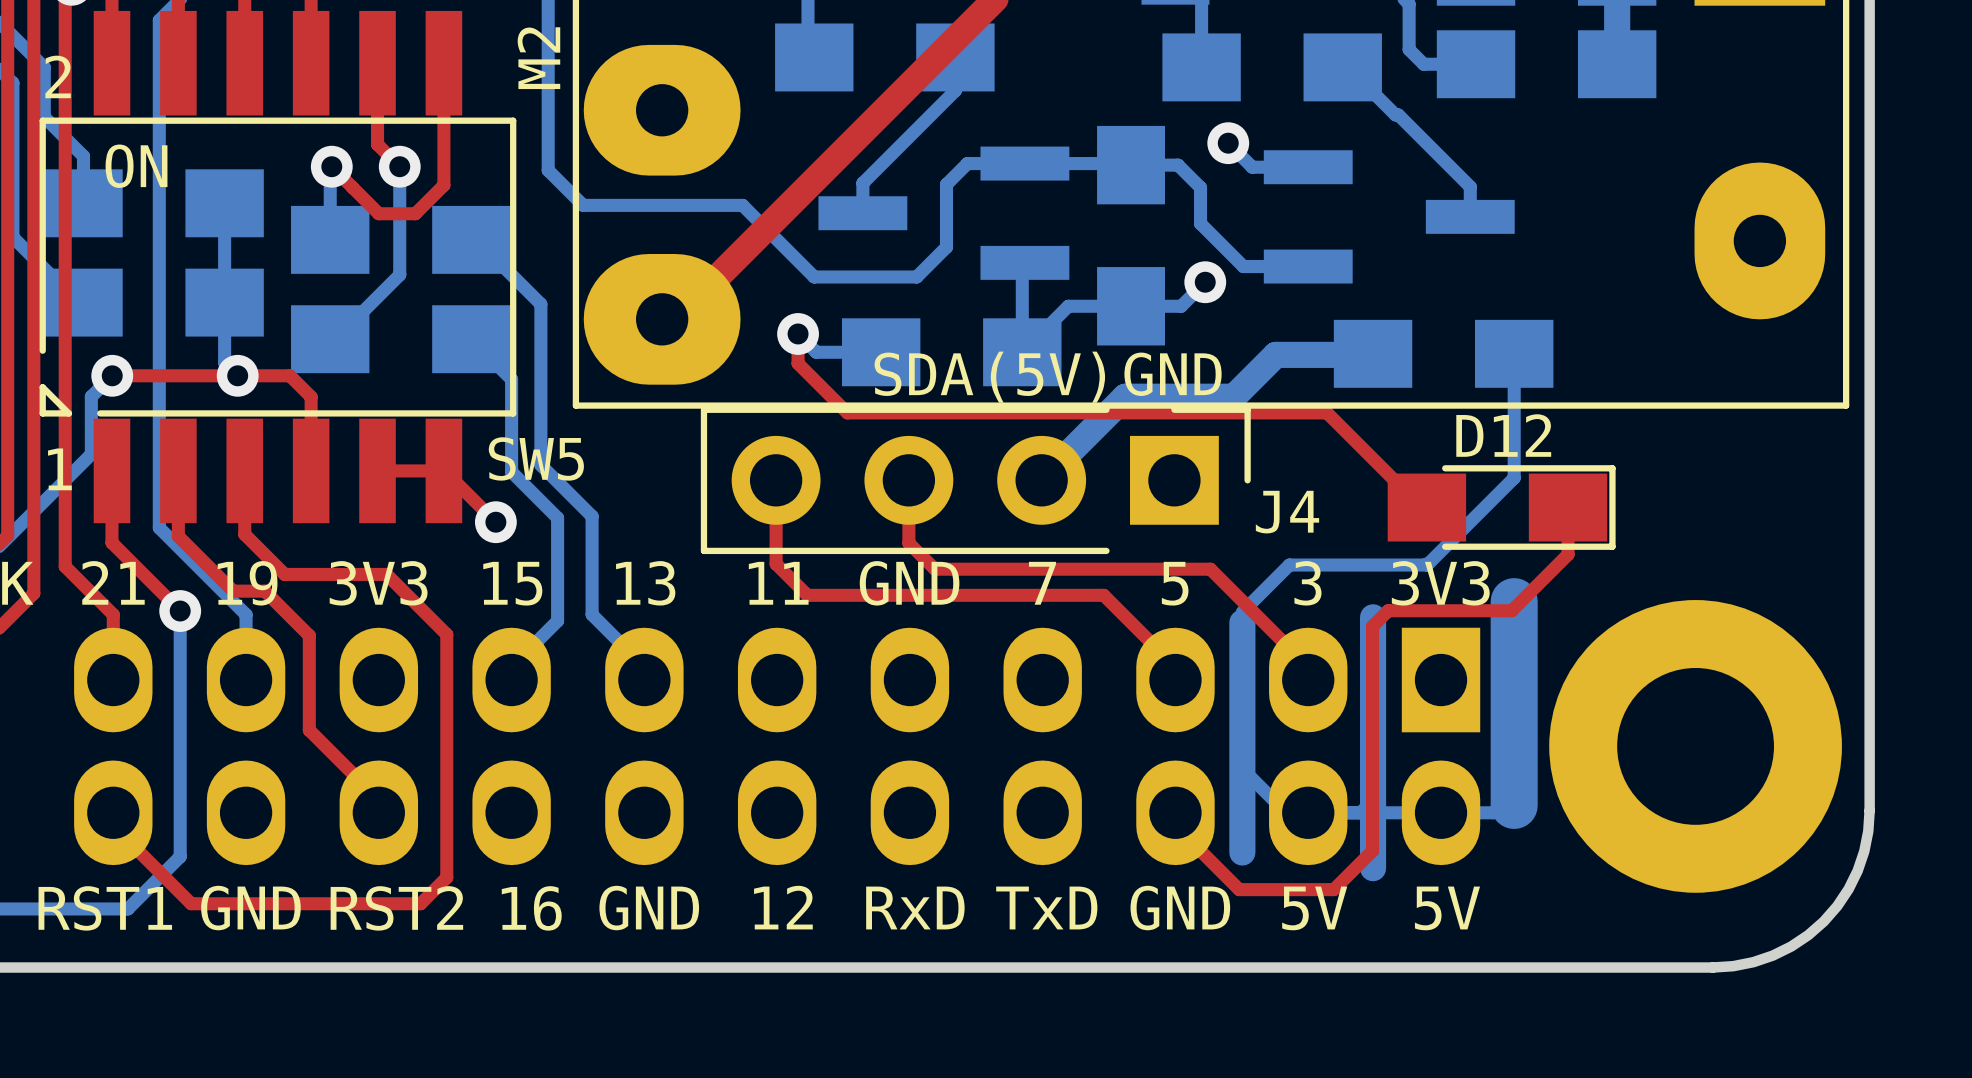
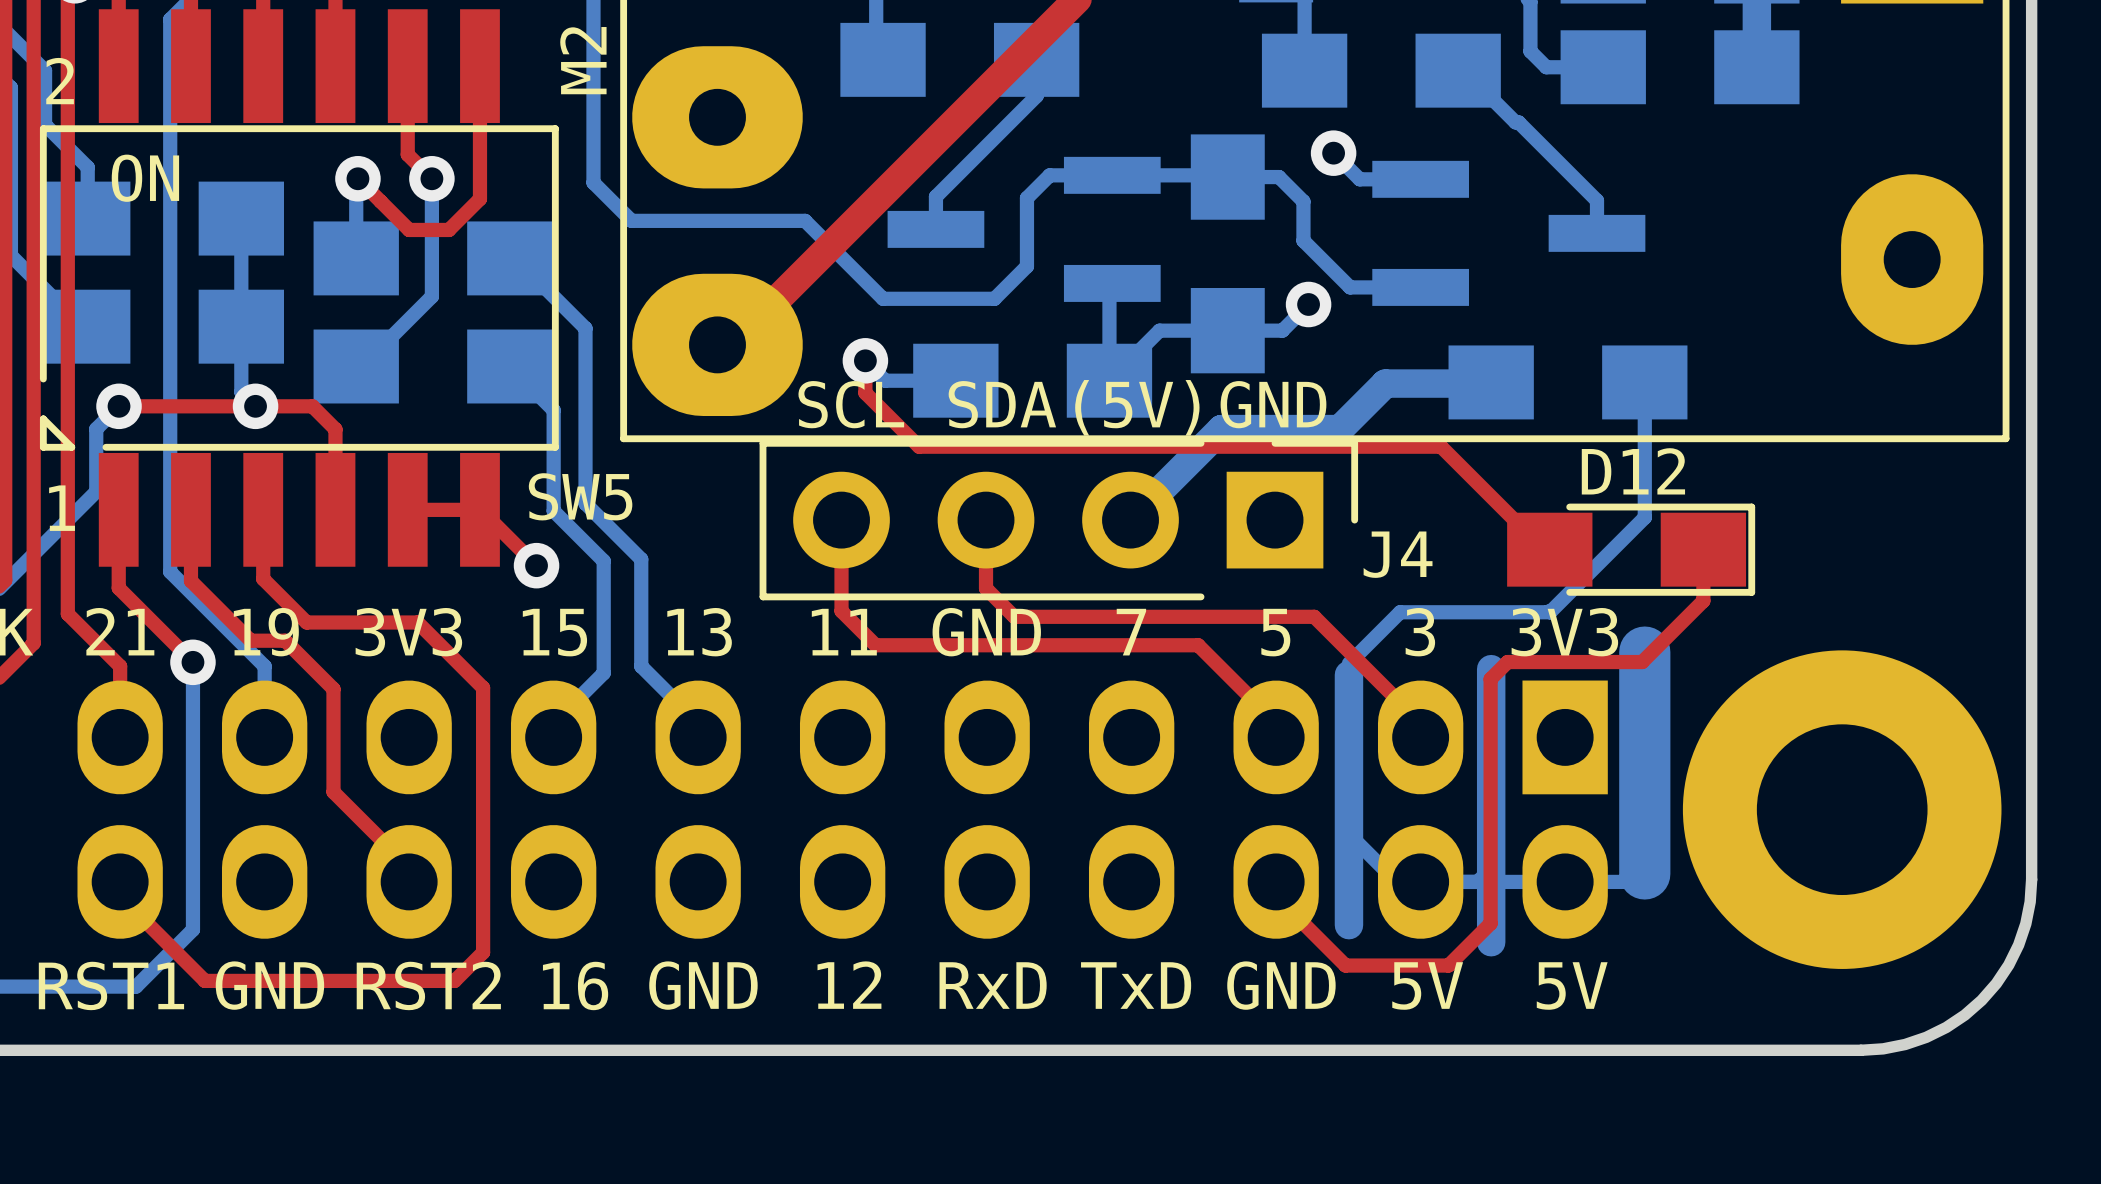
text: none -> SCL (851, 404)

